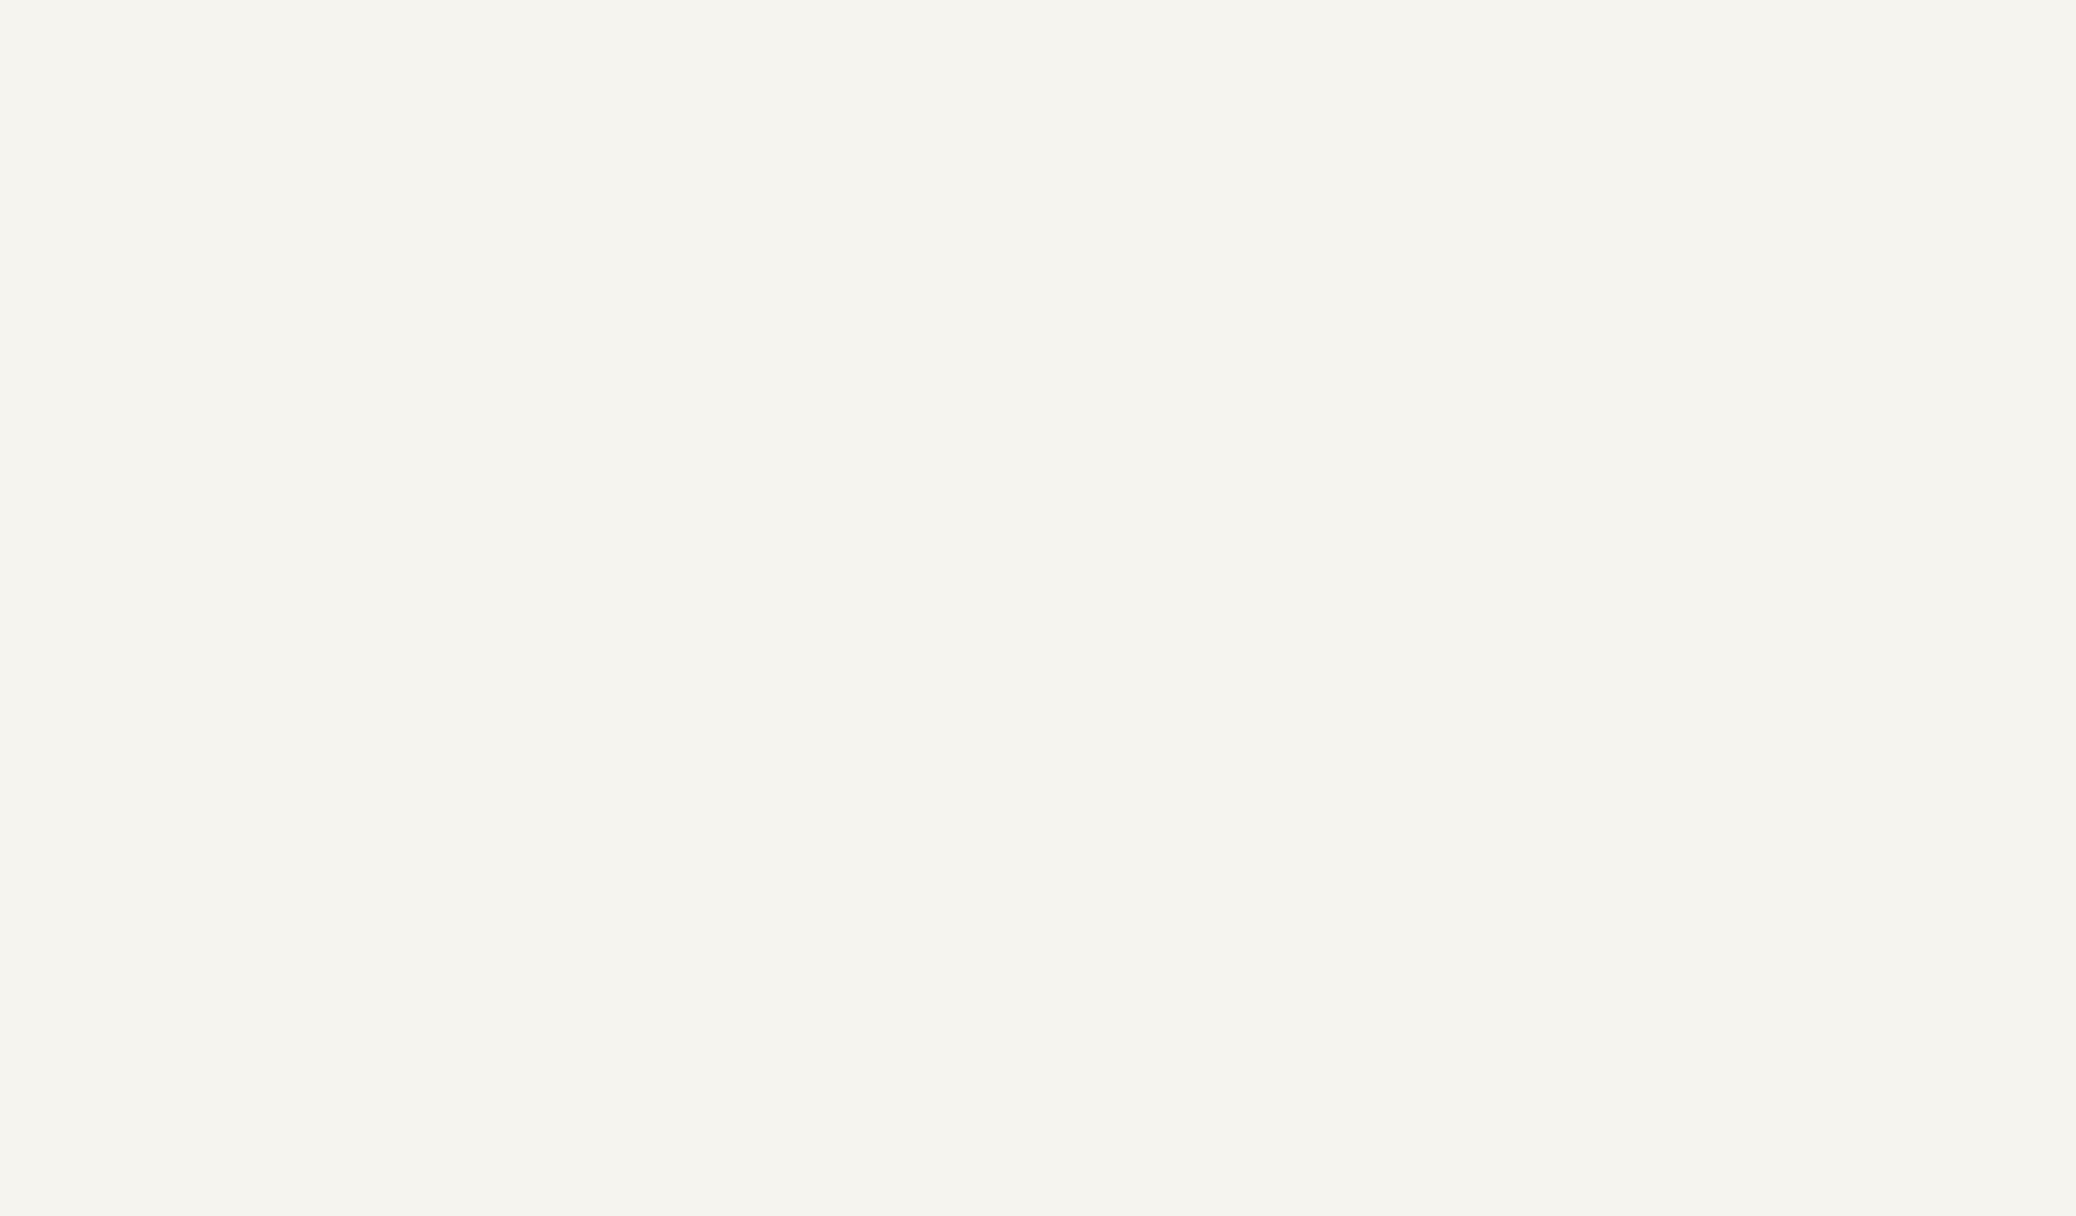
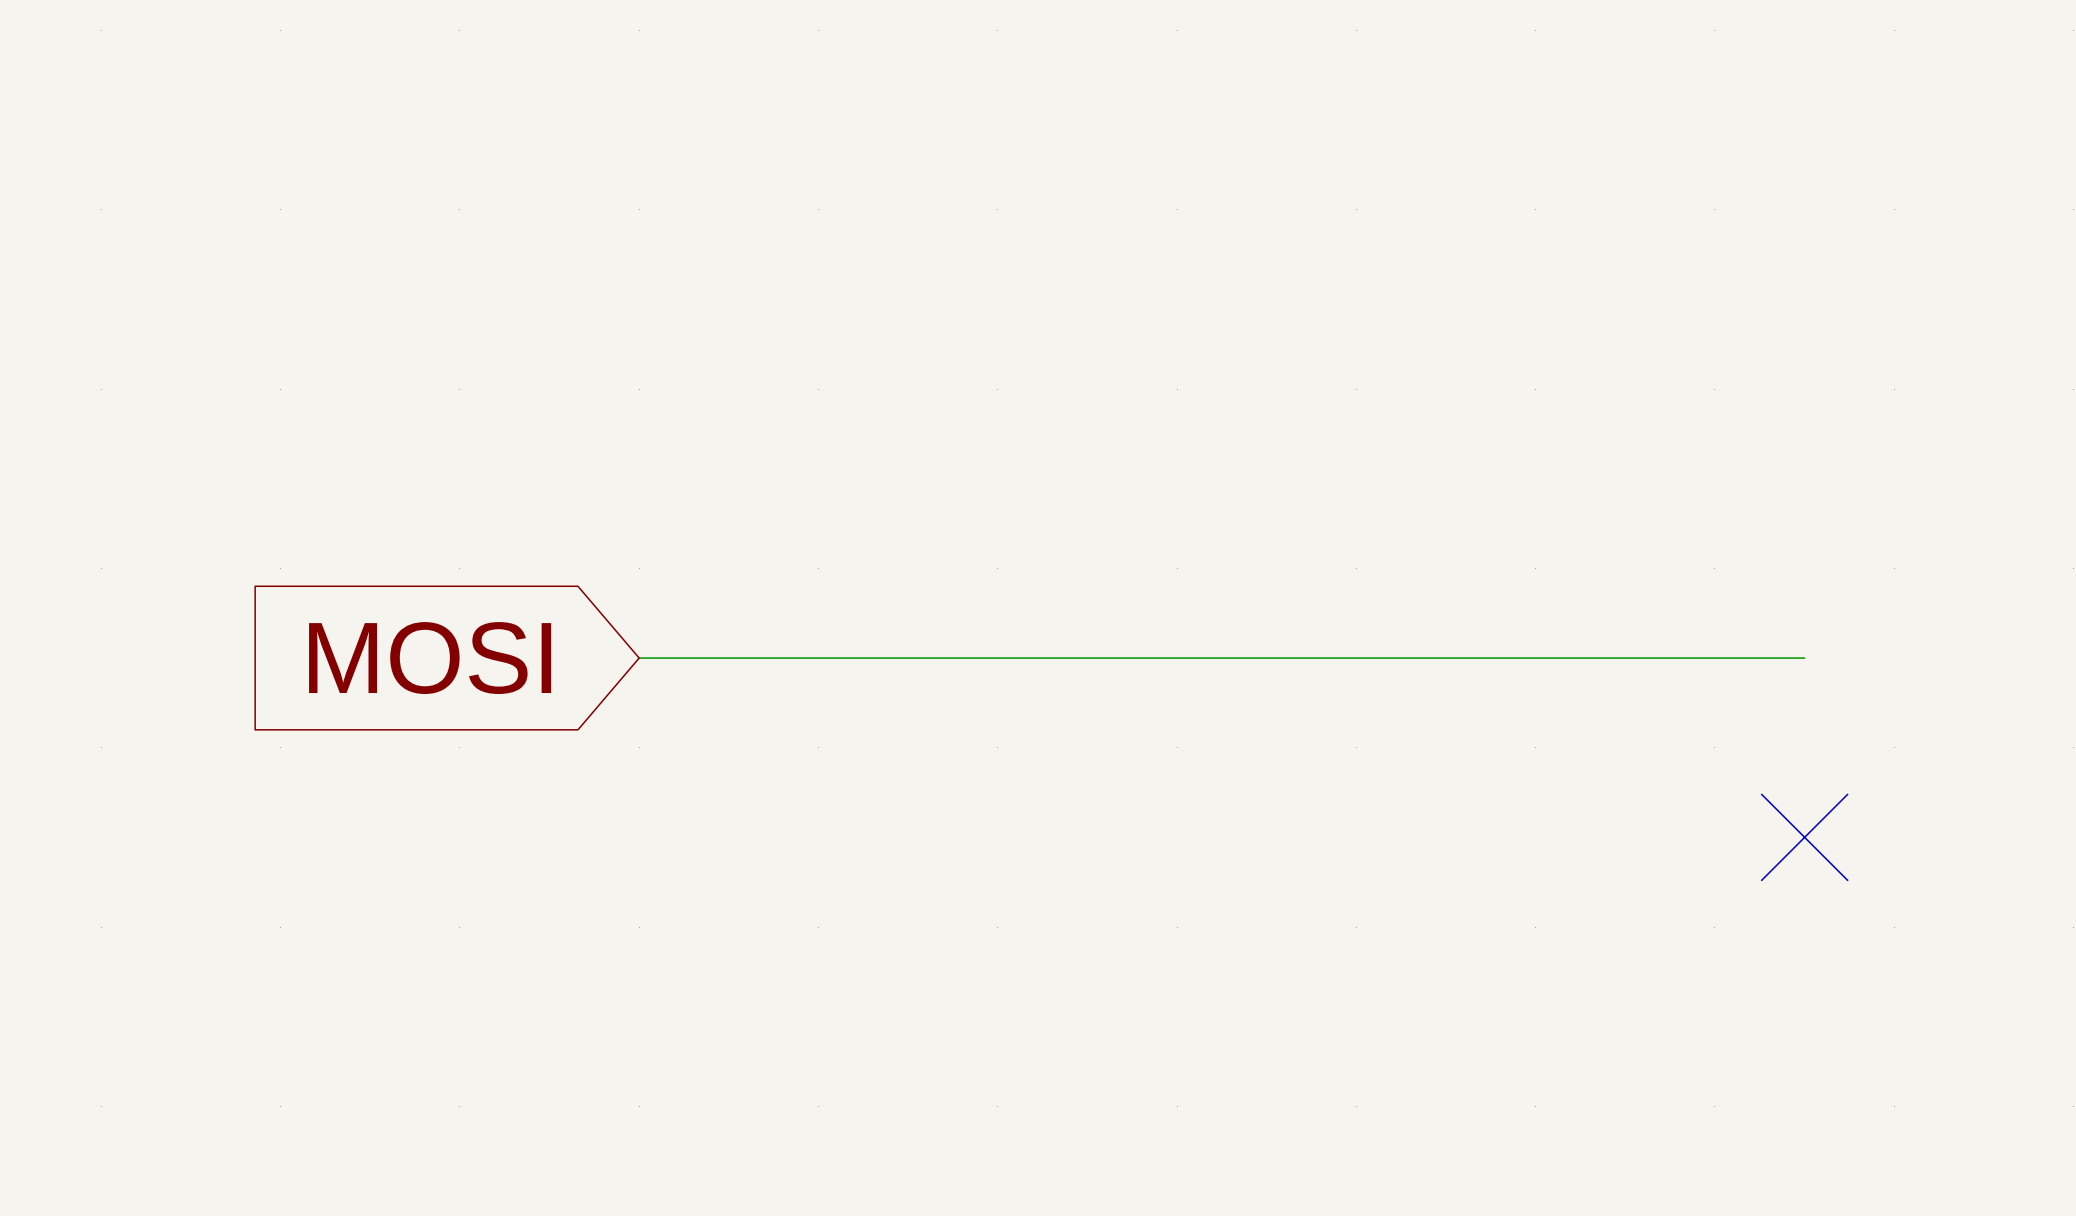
global label: none -> MOSI (430, 658)
wire: none -> (639, 658) (1804, 658)
no-connect mark: none -> (1804, 837)

